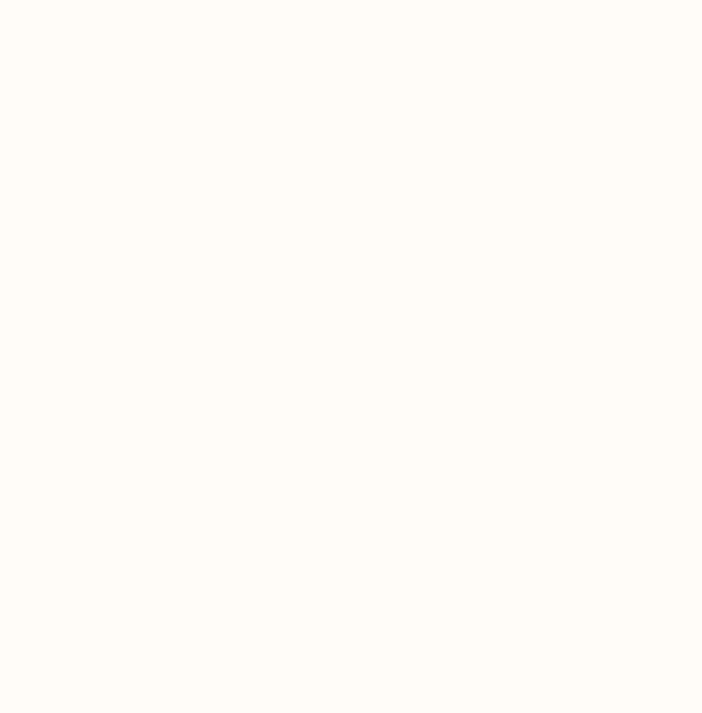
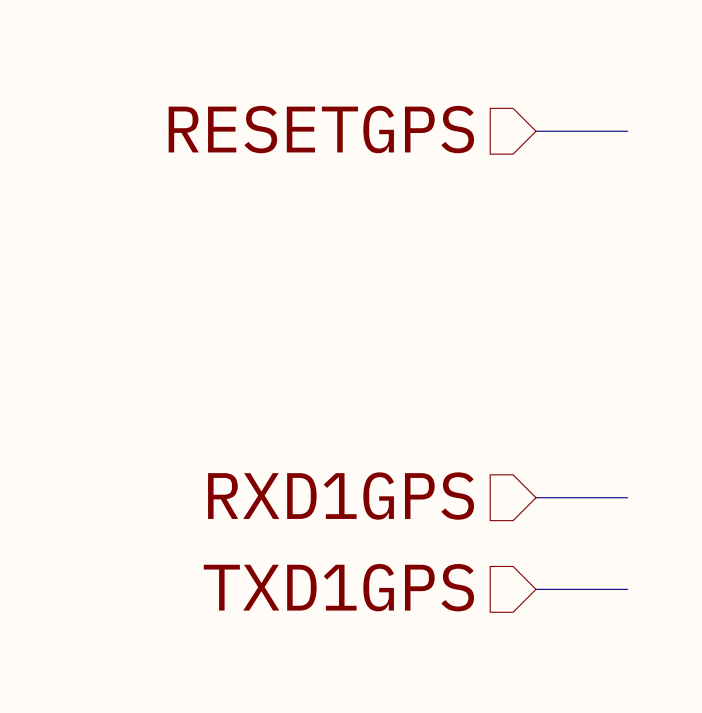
hierarchical label: none -> RESETGPS (321, 129)
wire: none -> (536, 131) (627, 131)
hierarchical label: none -> RXD1GPS (341, 496)
wire: none -> (536, 497) (627, 497)
hierarchical label: none -> TXD1GPS (338, 587)
wire: none -> (536, 589) (627, 589)

